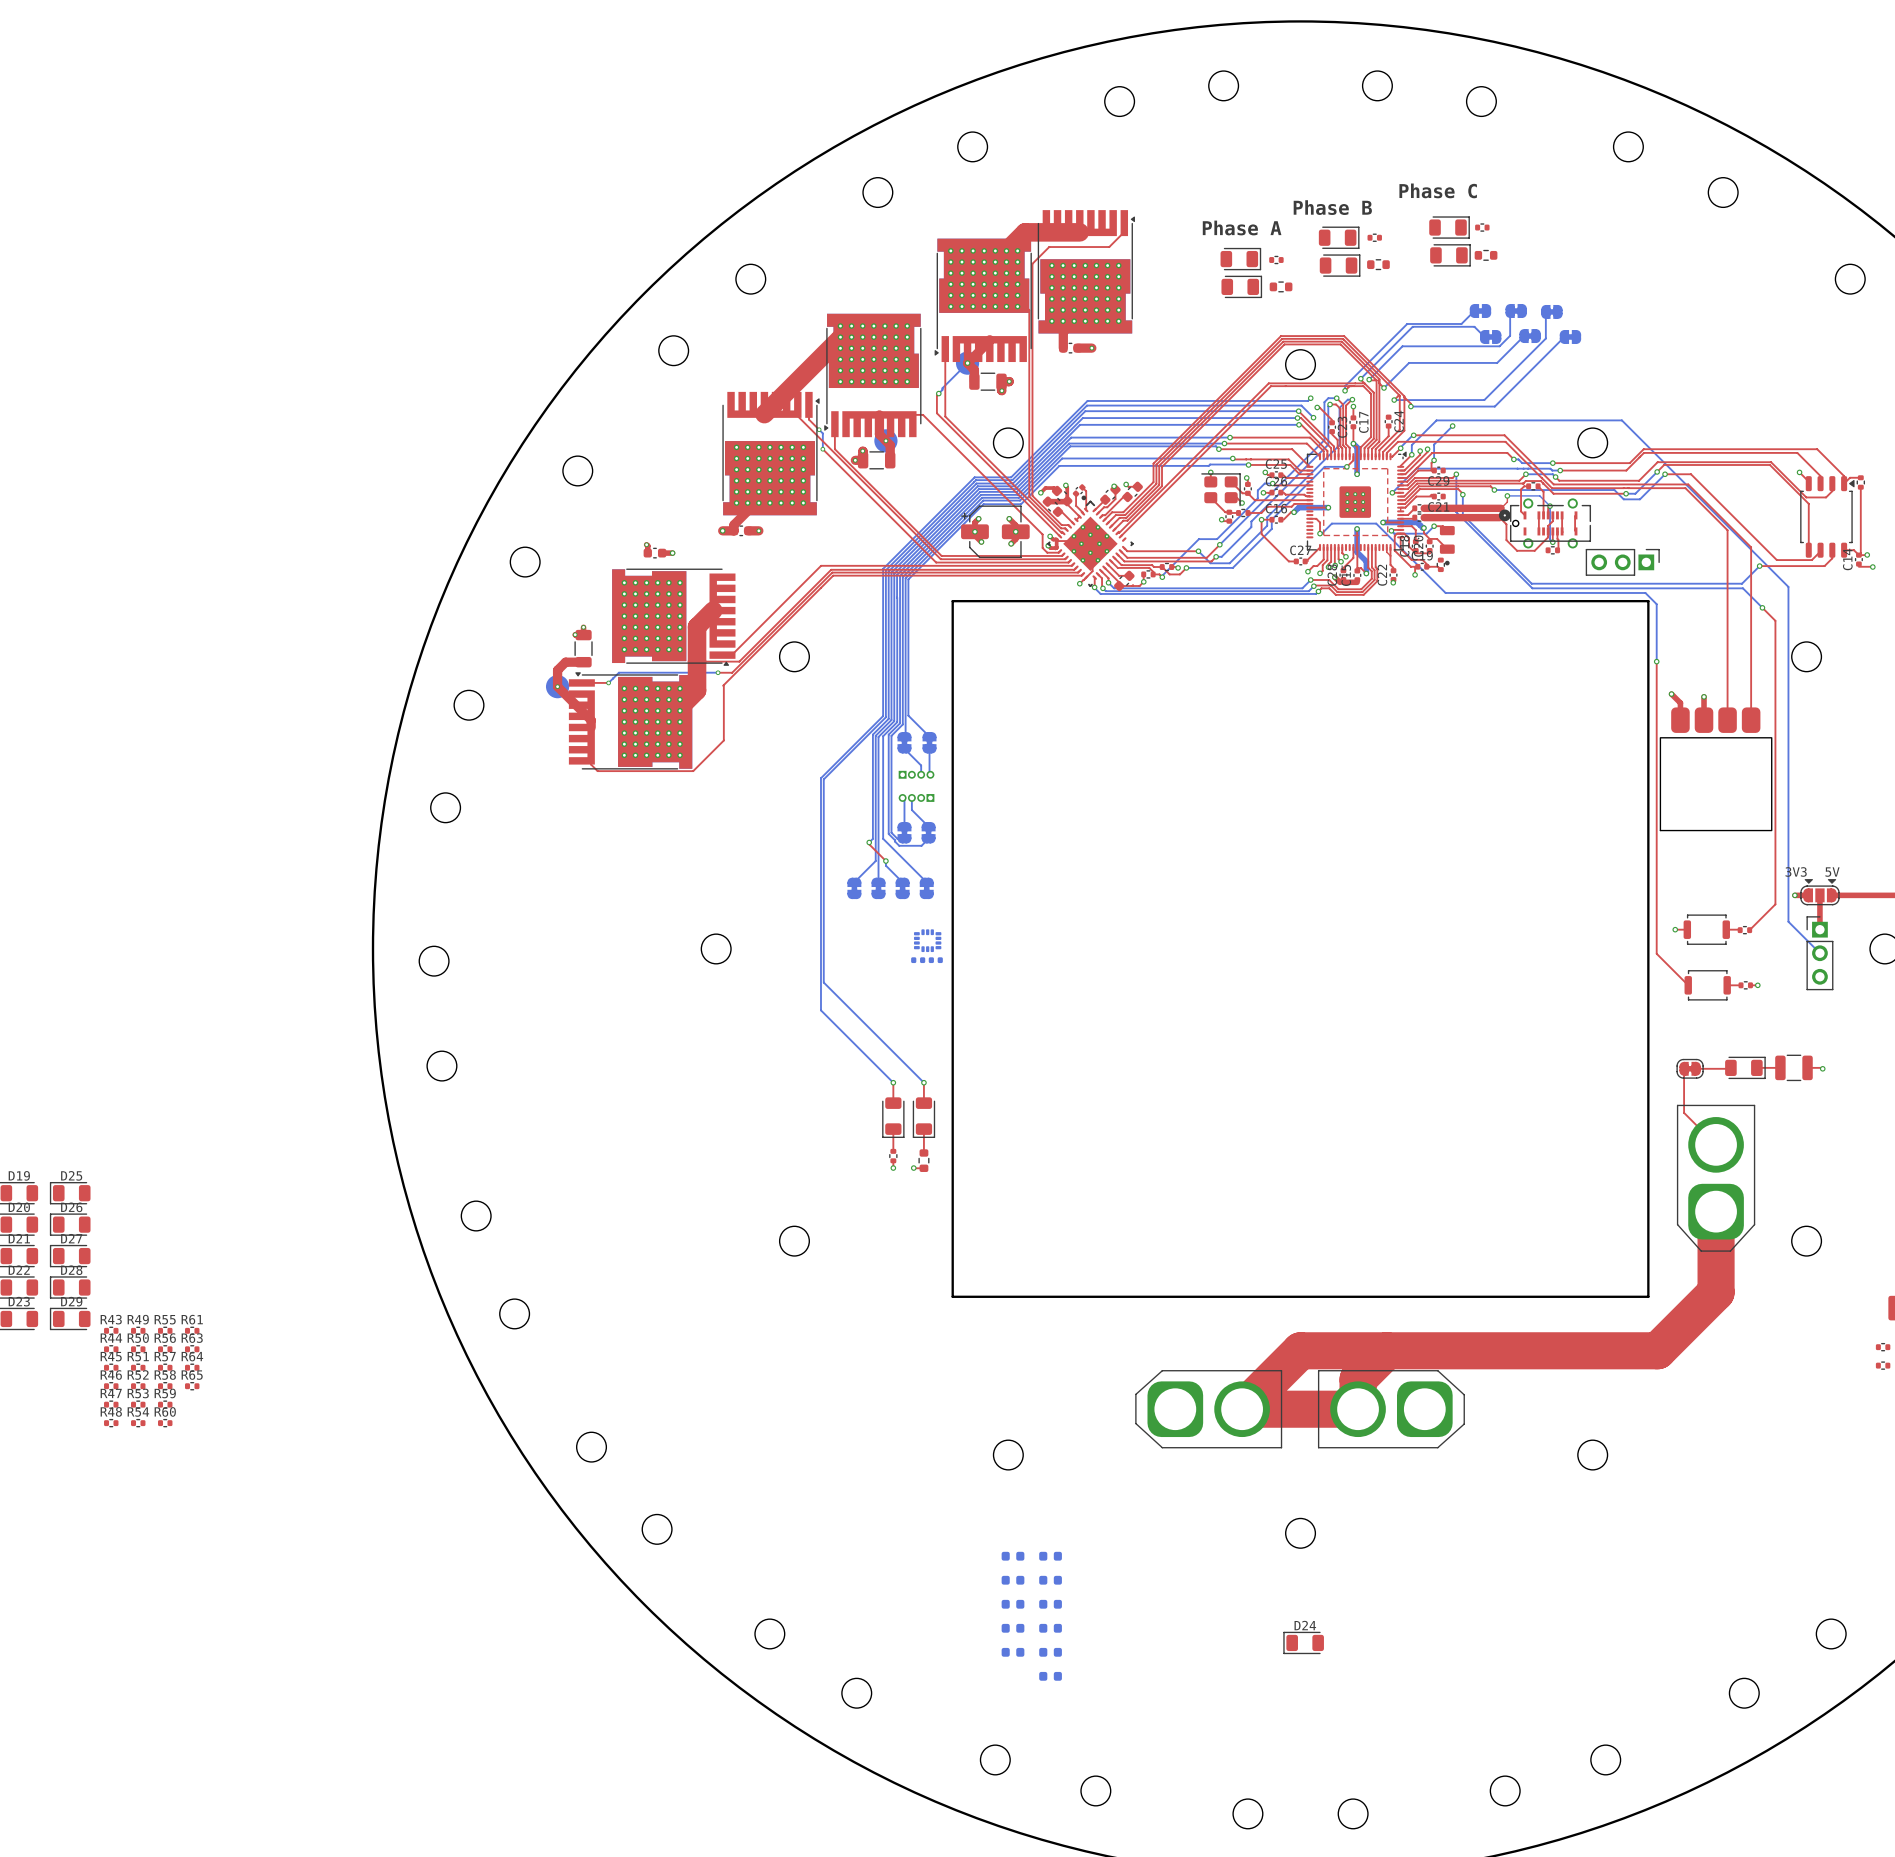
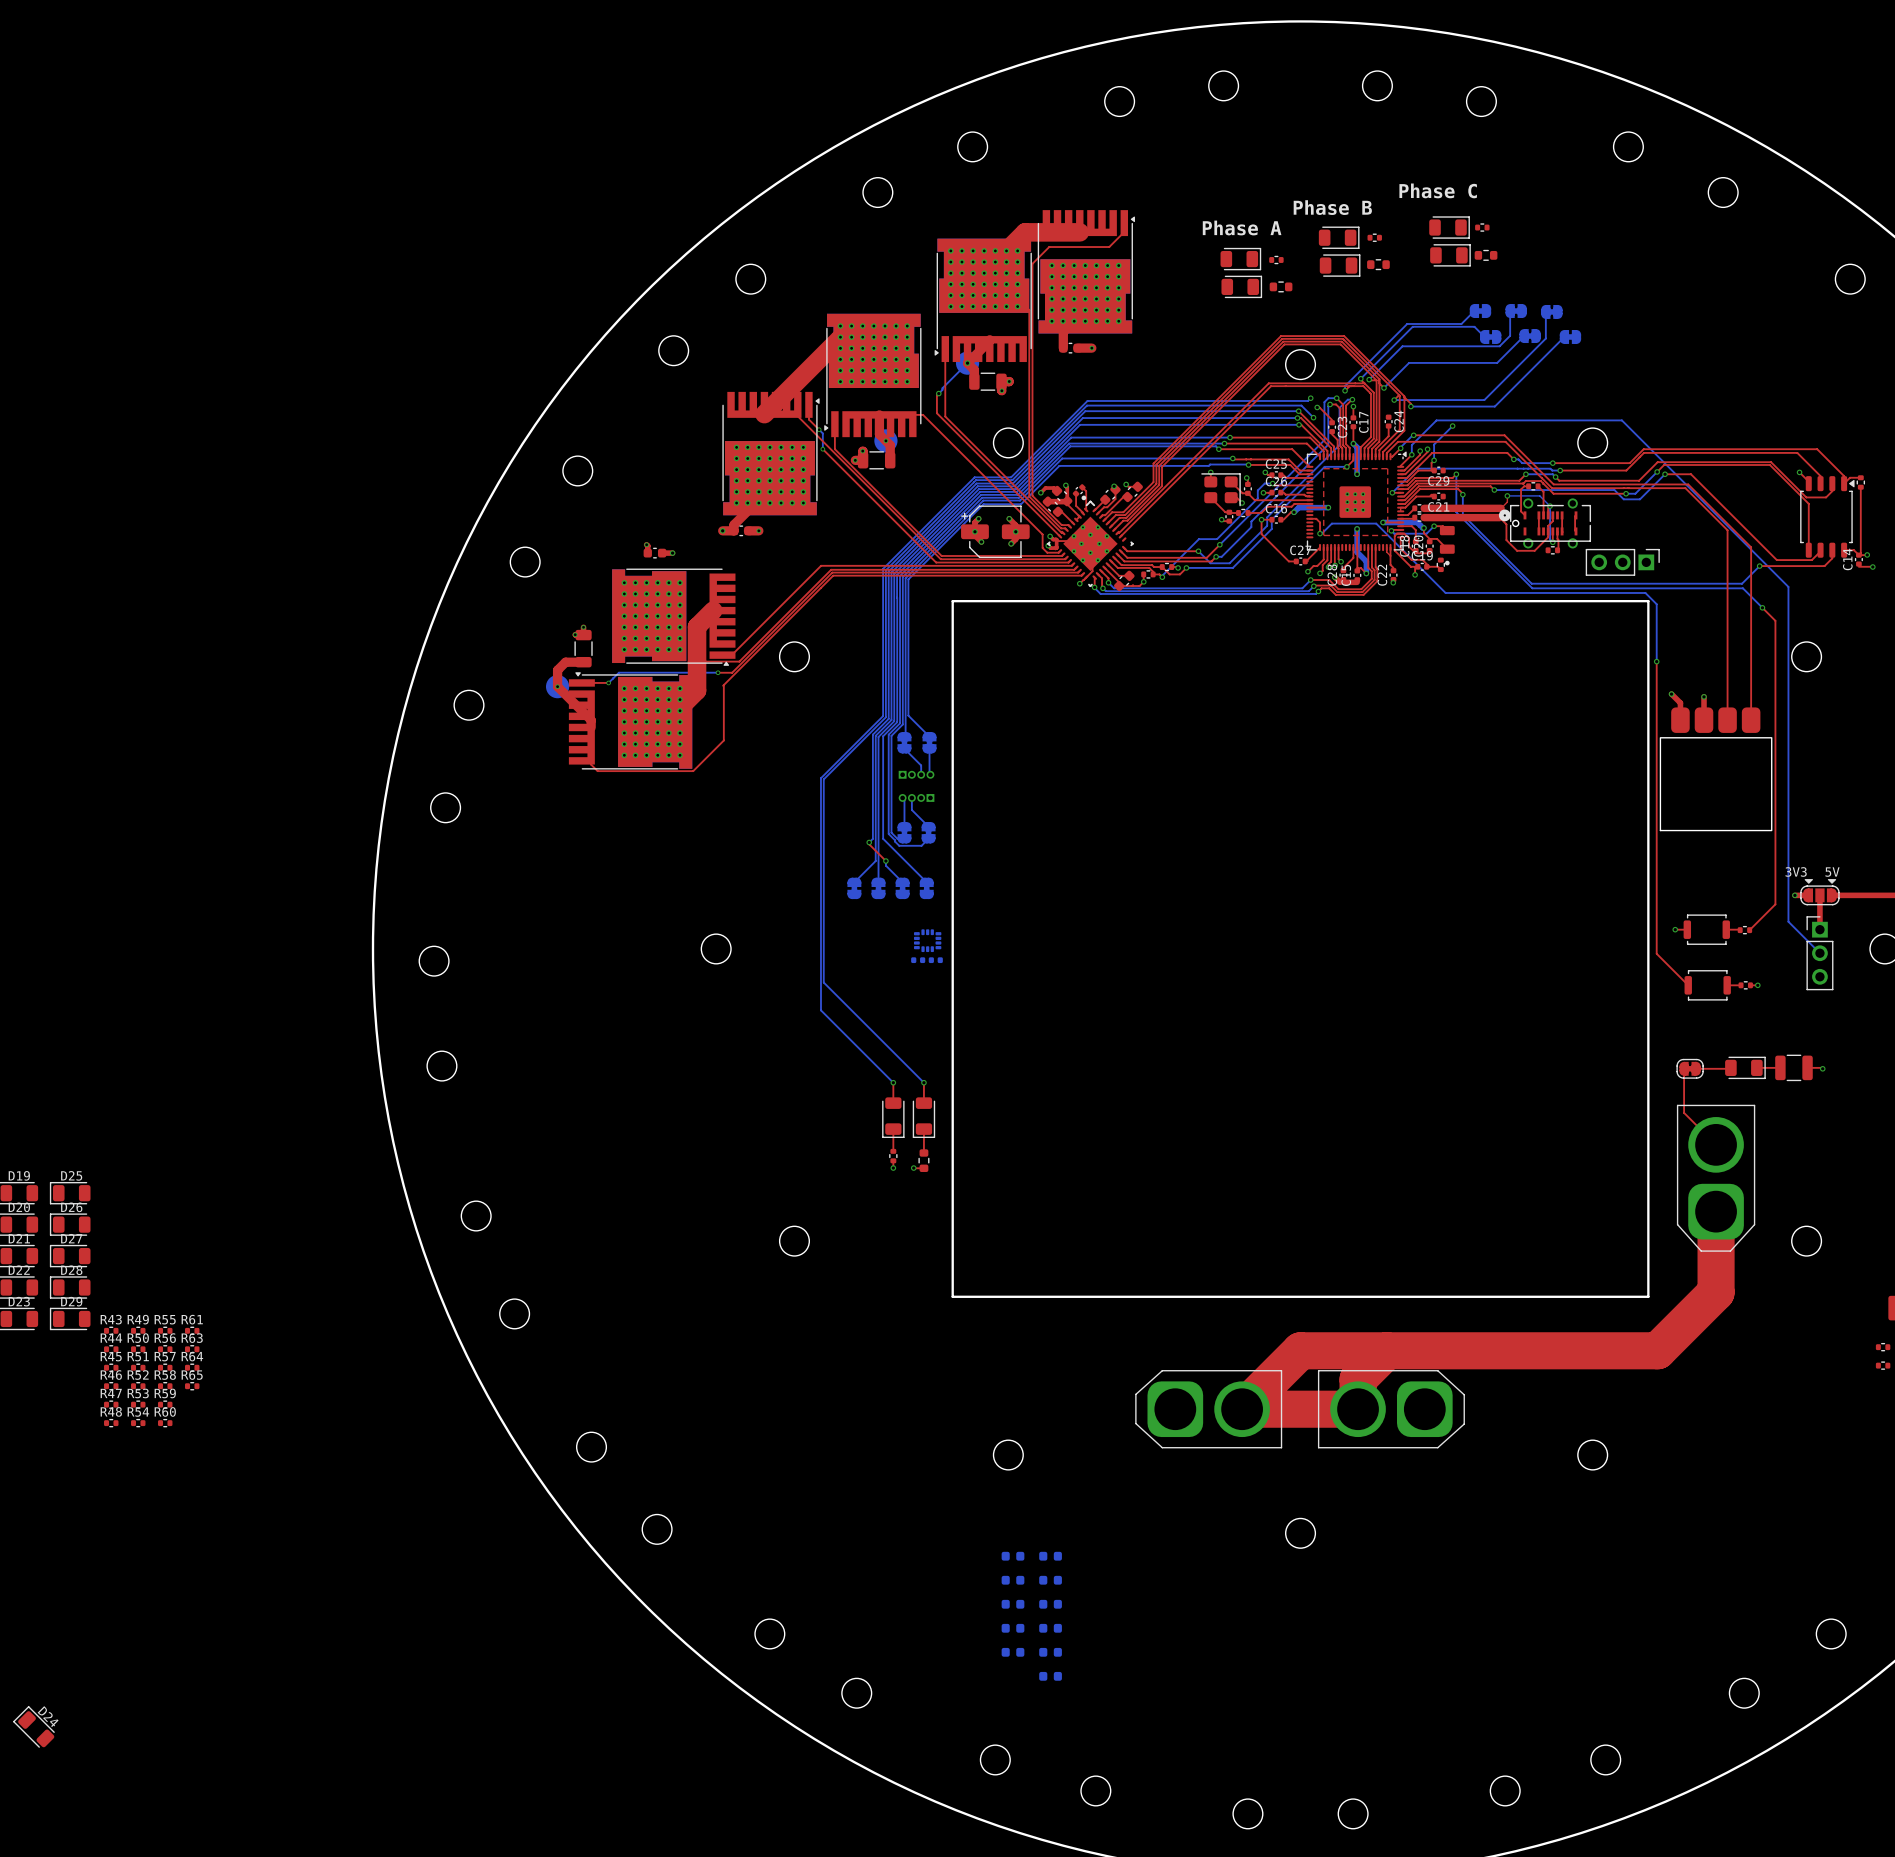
top track: (1342, 547) (1342, 553) (1345, 556) -> none
via: (1345, 556) -> none
D24 rotation: 0° (1303, 1642) -> 45° clockwise (33, 1726)
D24 position: (1303, 1642) -> (33, 1726)

